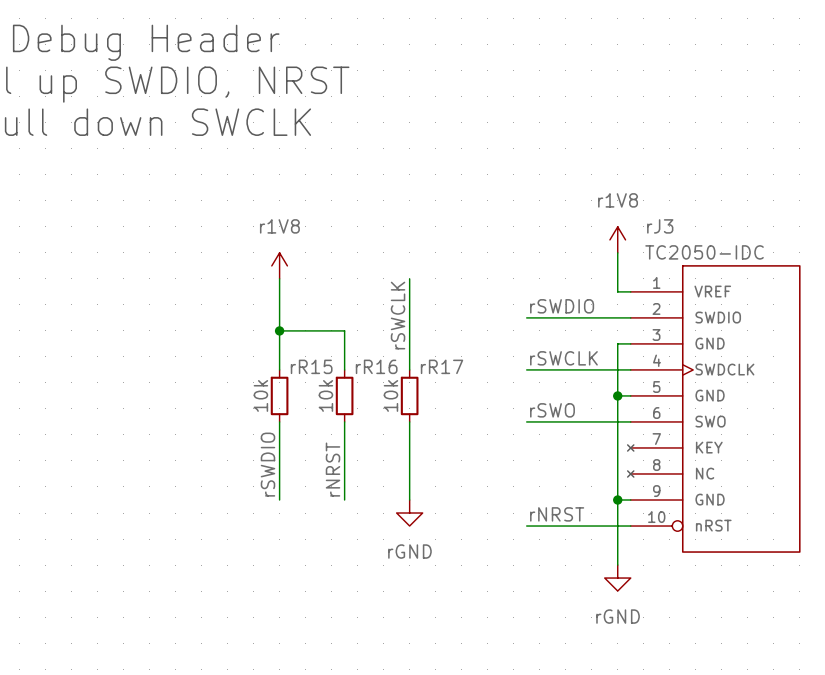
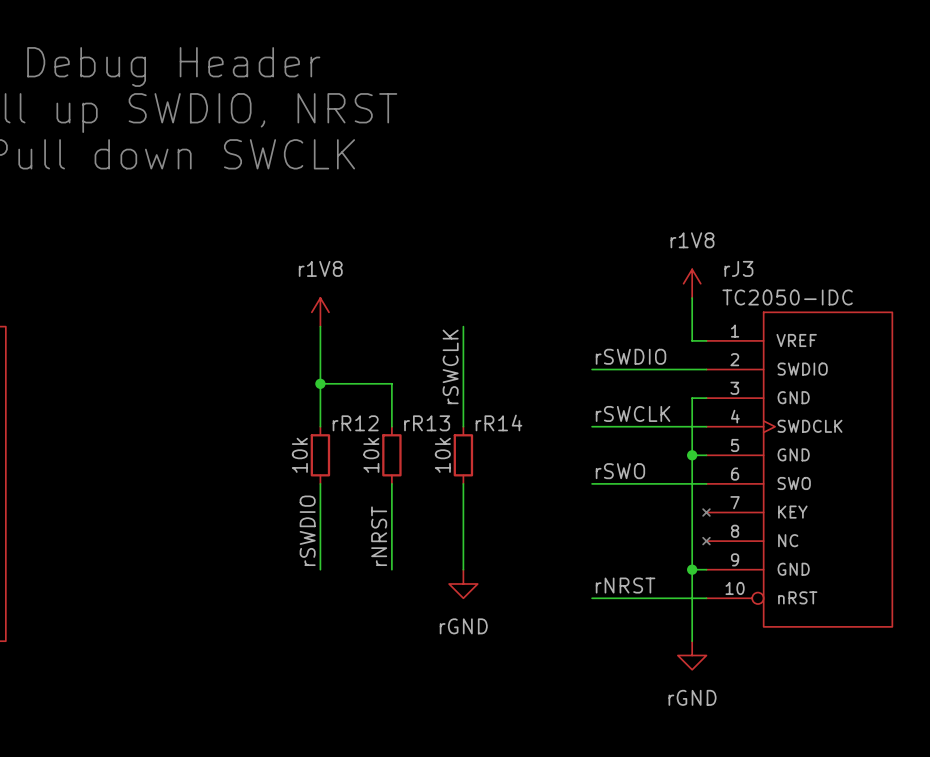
rR15 name: rR15 (311, 366) -> rR12 (355, 423)
rR16 name: rR16 (376, 366) -> rR13 (427, 423)
rR17 name: rR17 (442, 366) -> rR14 (498, 422)

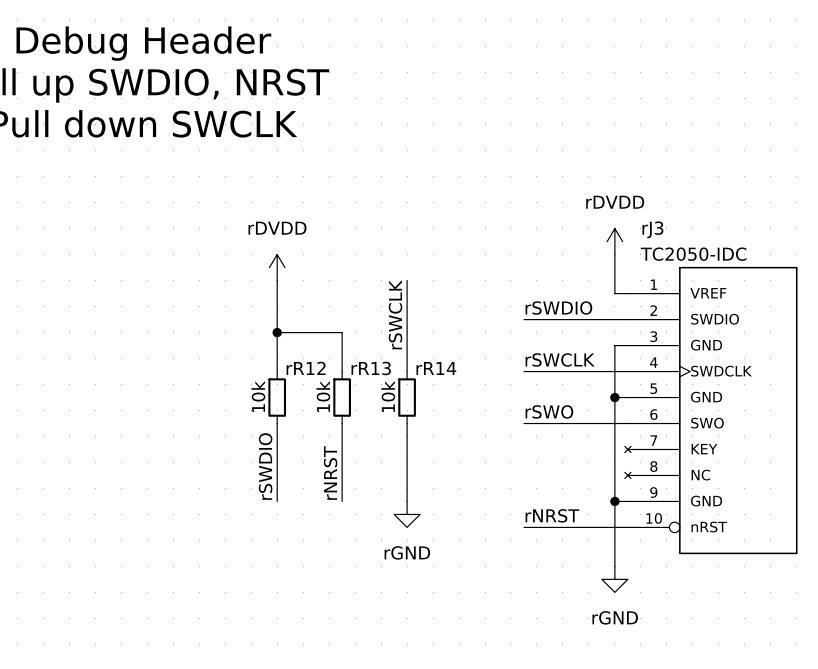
power symbol: r1V8 (692, 283) -> rDVDD (614, 241)
power symbol: r1V8 (320, 312) -> rDVDD (277, 267)

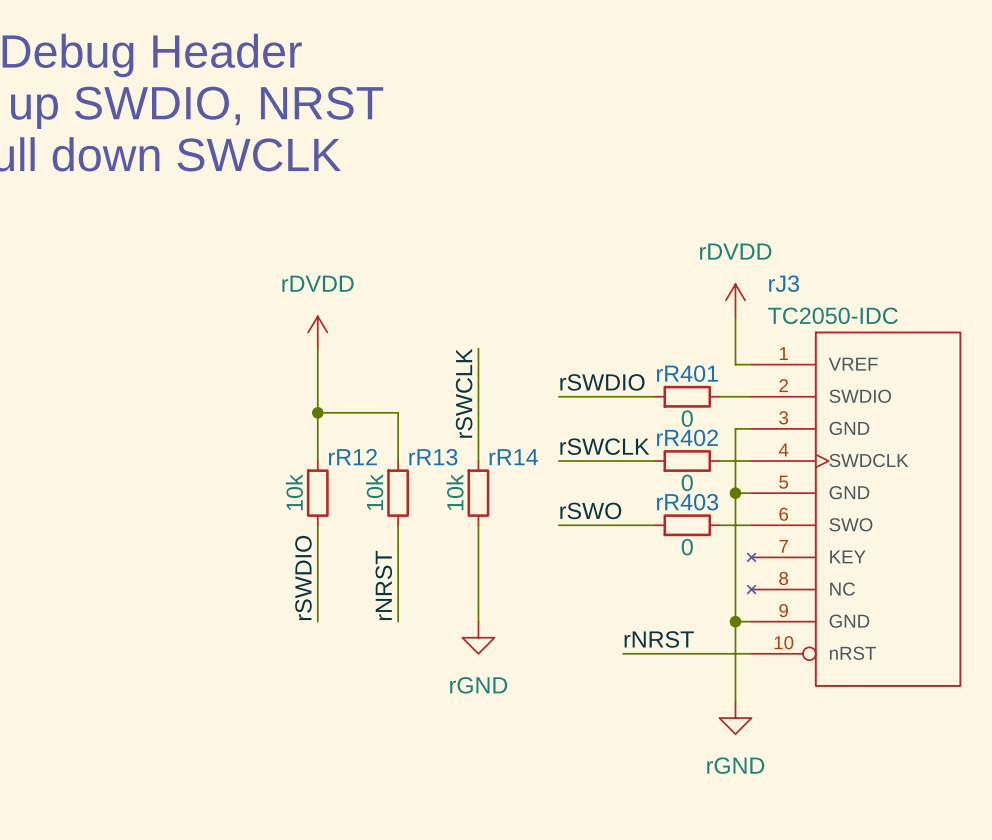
label position: rSWDIO (558, 308) -> rSWDIO (602, 382)
wire: (549, 319) (601, 319) -> (558, 396) (623, 396)
rR401: none -> 0 (687, 396)
label position: rSWCLK (560, 359) -> rSWCLK (604, 446)
wire: (549, 371) (601, 371) -> (558, 461) (623, 461)
rR402: none -> 0 (687, 461)
label position: rSWO (549, 411) -> rSWO (590, 510)
wire: (549, 423) (601, 423) -> (558, 525) (623, 525)
rR403: none -> 0 (687, 525)

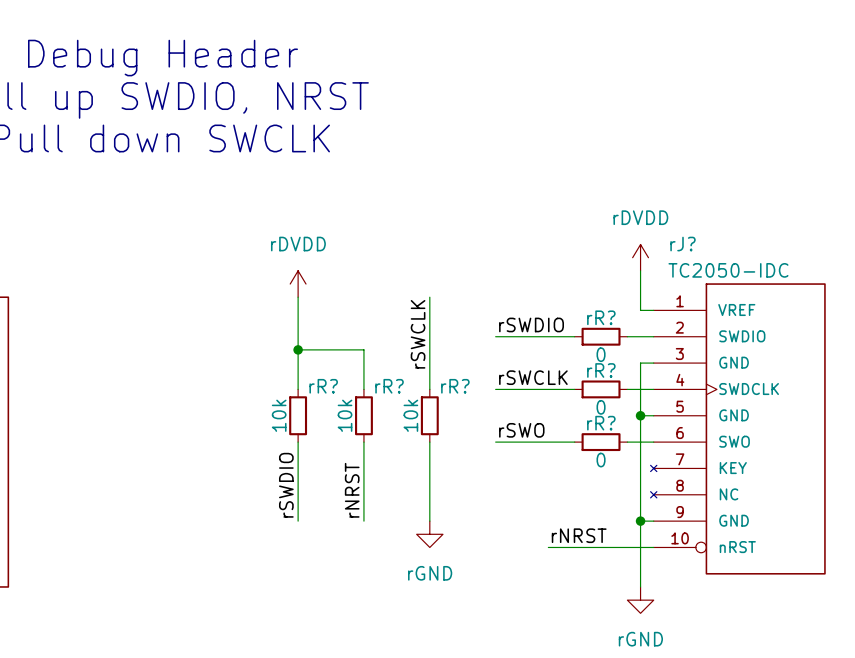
rJ3 name: rJ3 (784, 283) -> rJ? (682, 244)
rR401 name: rR401 (687, 373) -> rR? (601, 317)
rR402 name: rR402 (687, 437) -> rR? (601, 370)
rR12 name: rR12 (352, 457) -> rR? (323, 386)
rR13 name: rR13 (433, 457) -> rR? (389, 386)
rR14 name: rR14 (513, 457) -> rR? (455, 386)
rR403 name: rR403 (687, 502) -> rR? (601, 423)

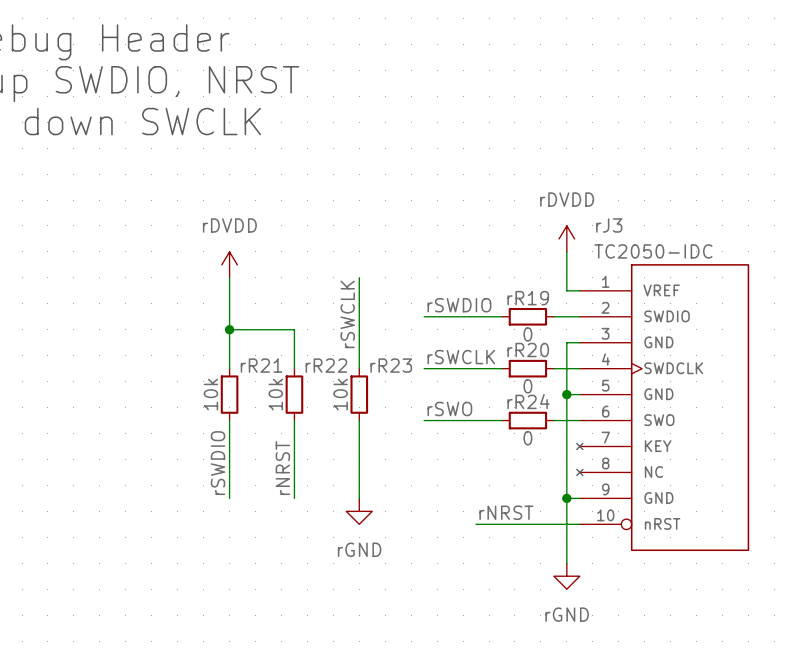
rJ? name: rJ? (682, 244) -> rJ3 (609, 225)
rR? name: rR? (601, 317) -> rR19 (528, 298)
rR? name: rR? (601, 370) -> rR20 (528, 350)
rR? name: rR? (323, 386) -> rR21 (261, 365)
rR? name: rR? (389, 386) -> rR22 (326, 365)
rR? name: rR? (455, 386) -> rR23 (391, 365)
rR? name: rR? (601, 423) -> rR24 (528, 401)

